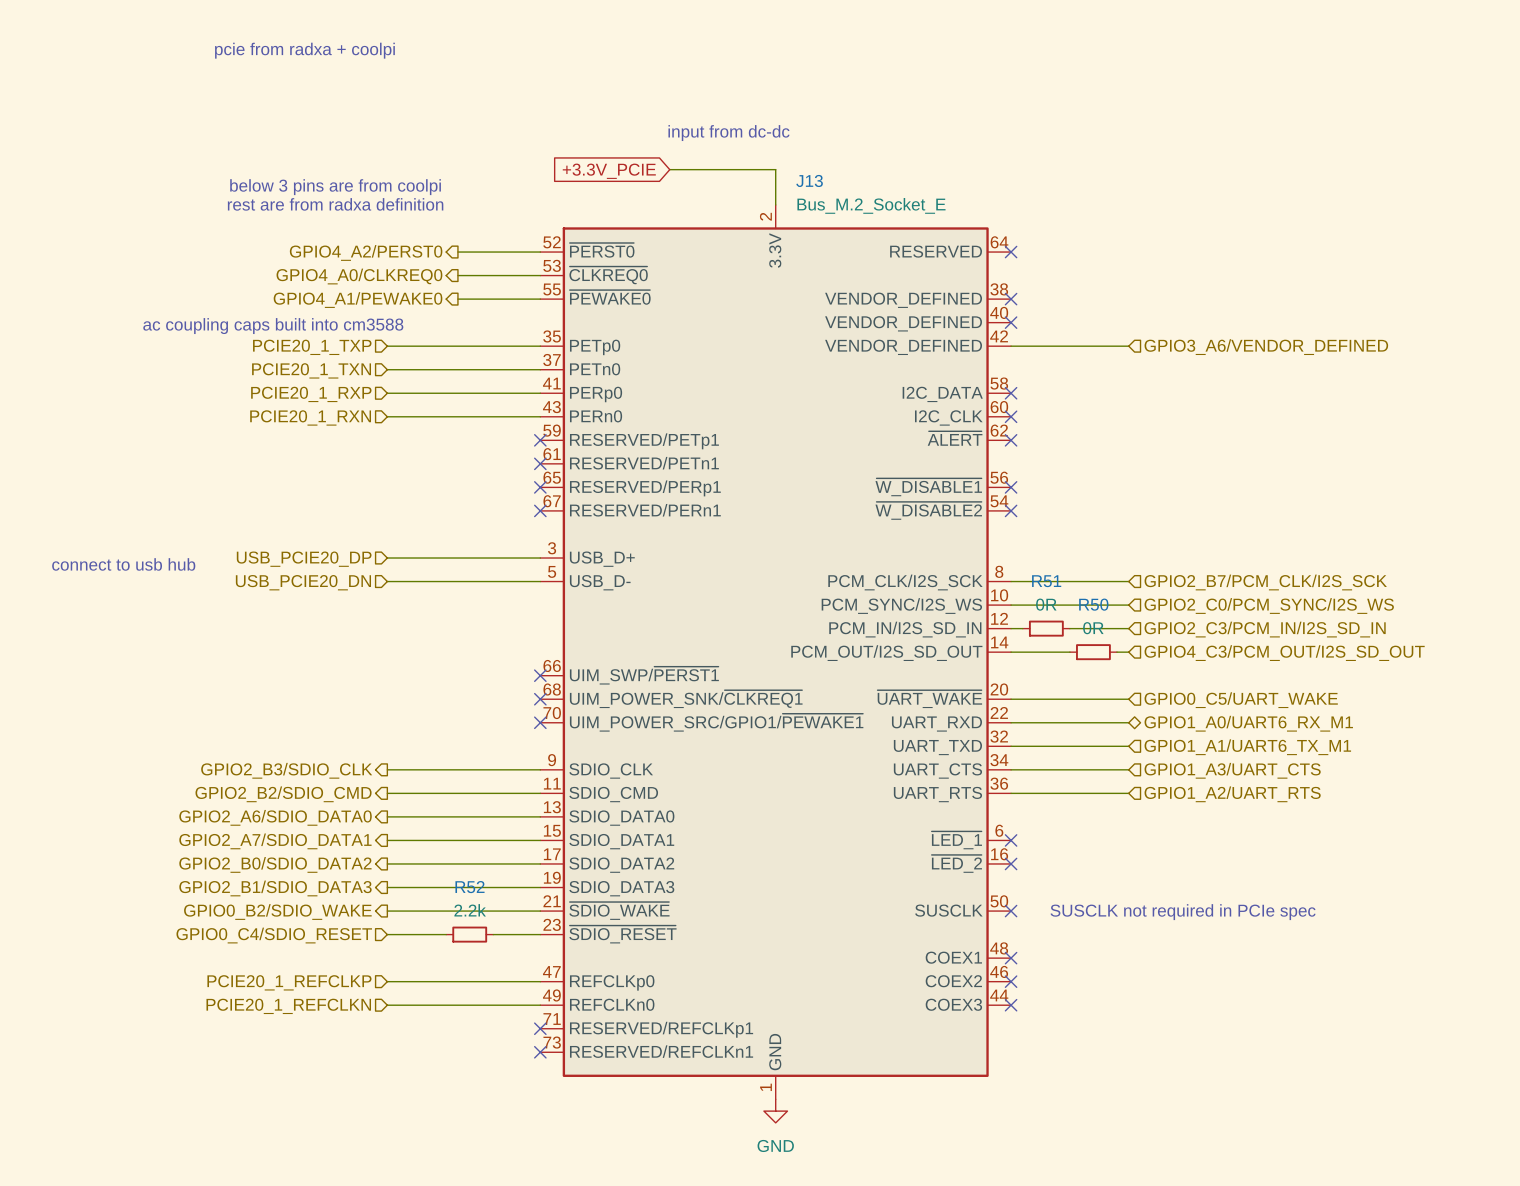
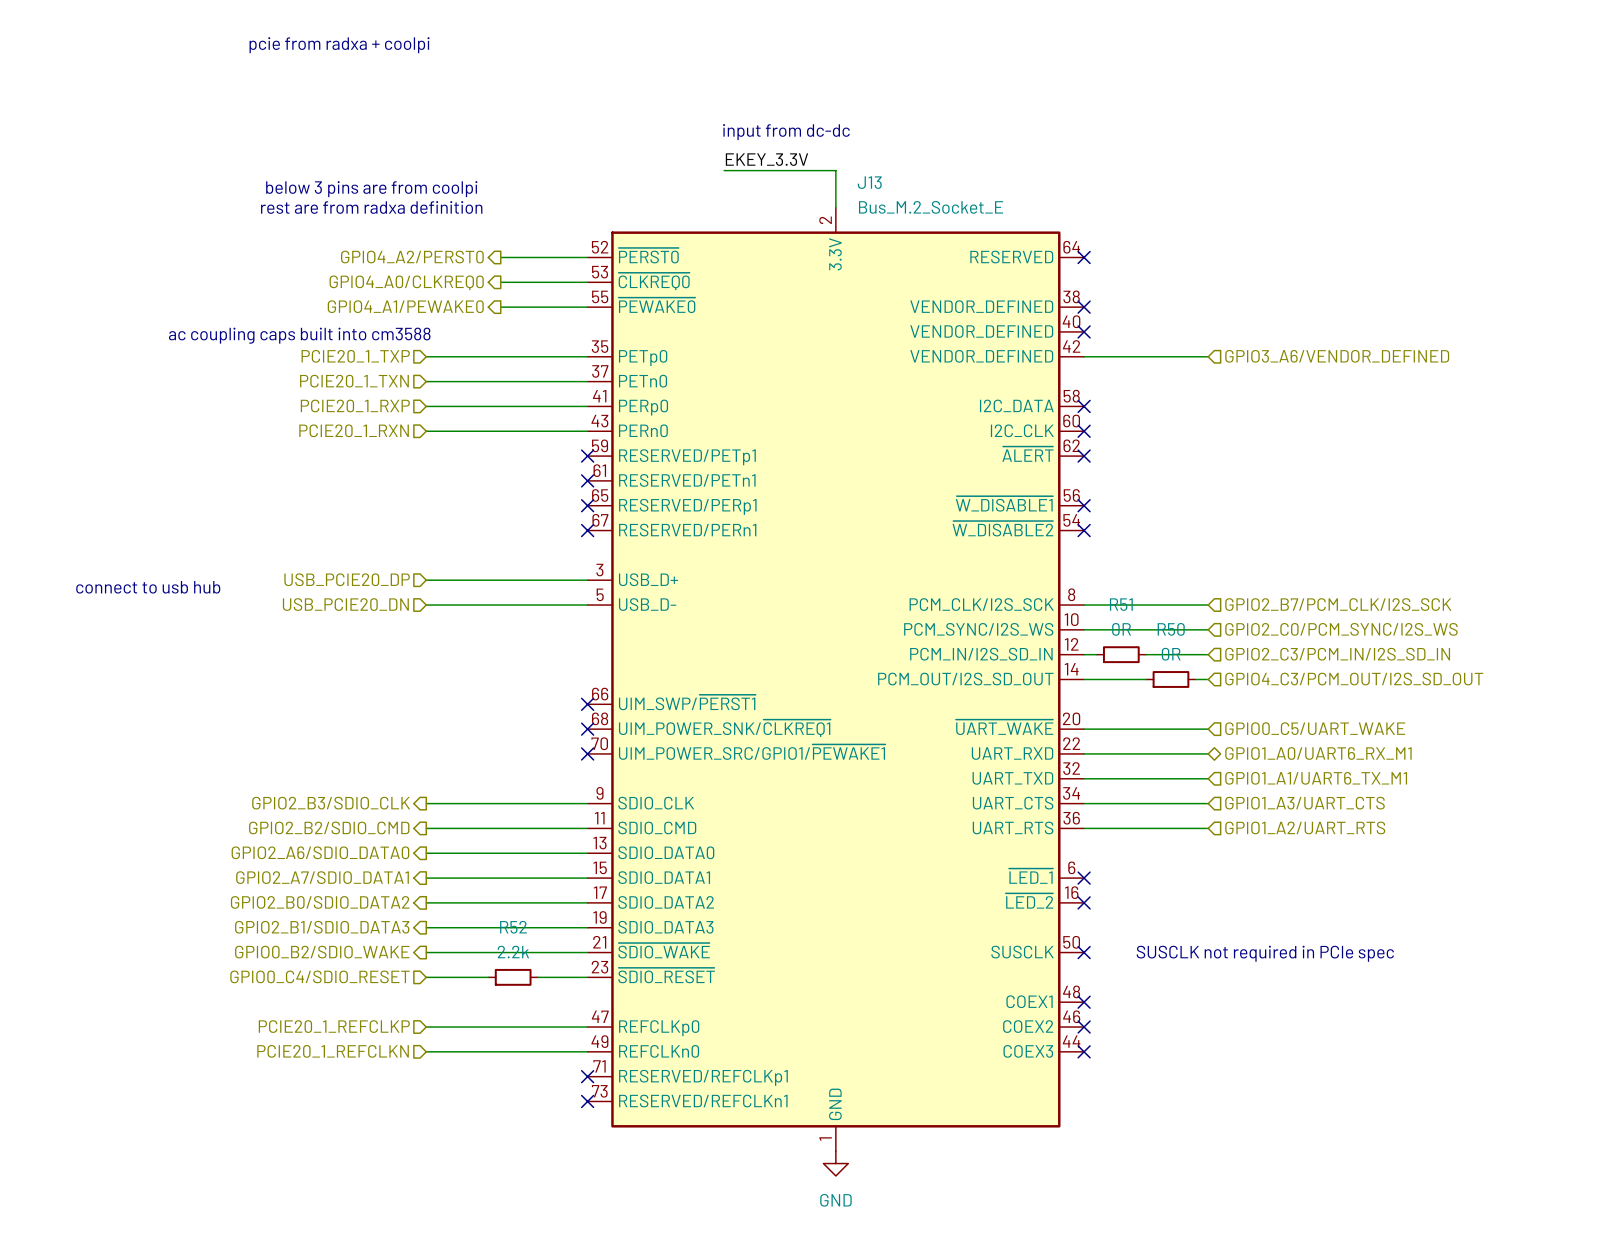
label: none -> EKEY_3.3V (766, 159)
global label: +3.3V_PCIE (609, 171) -> none

